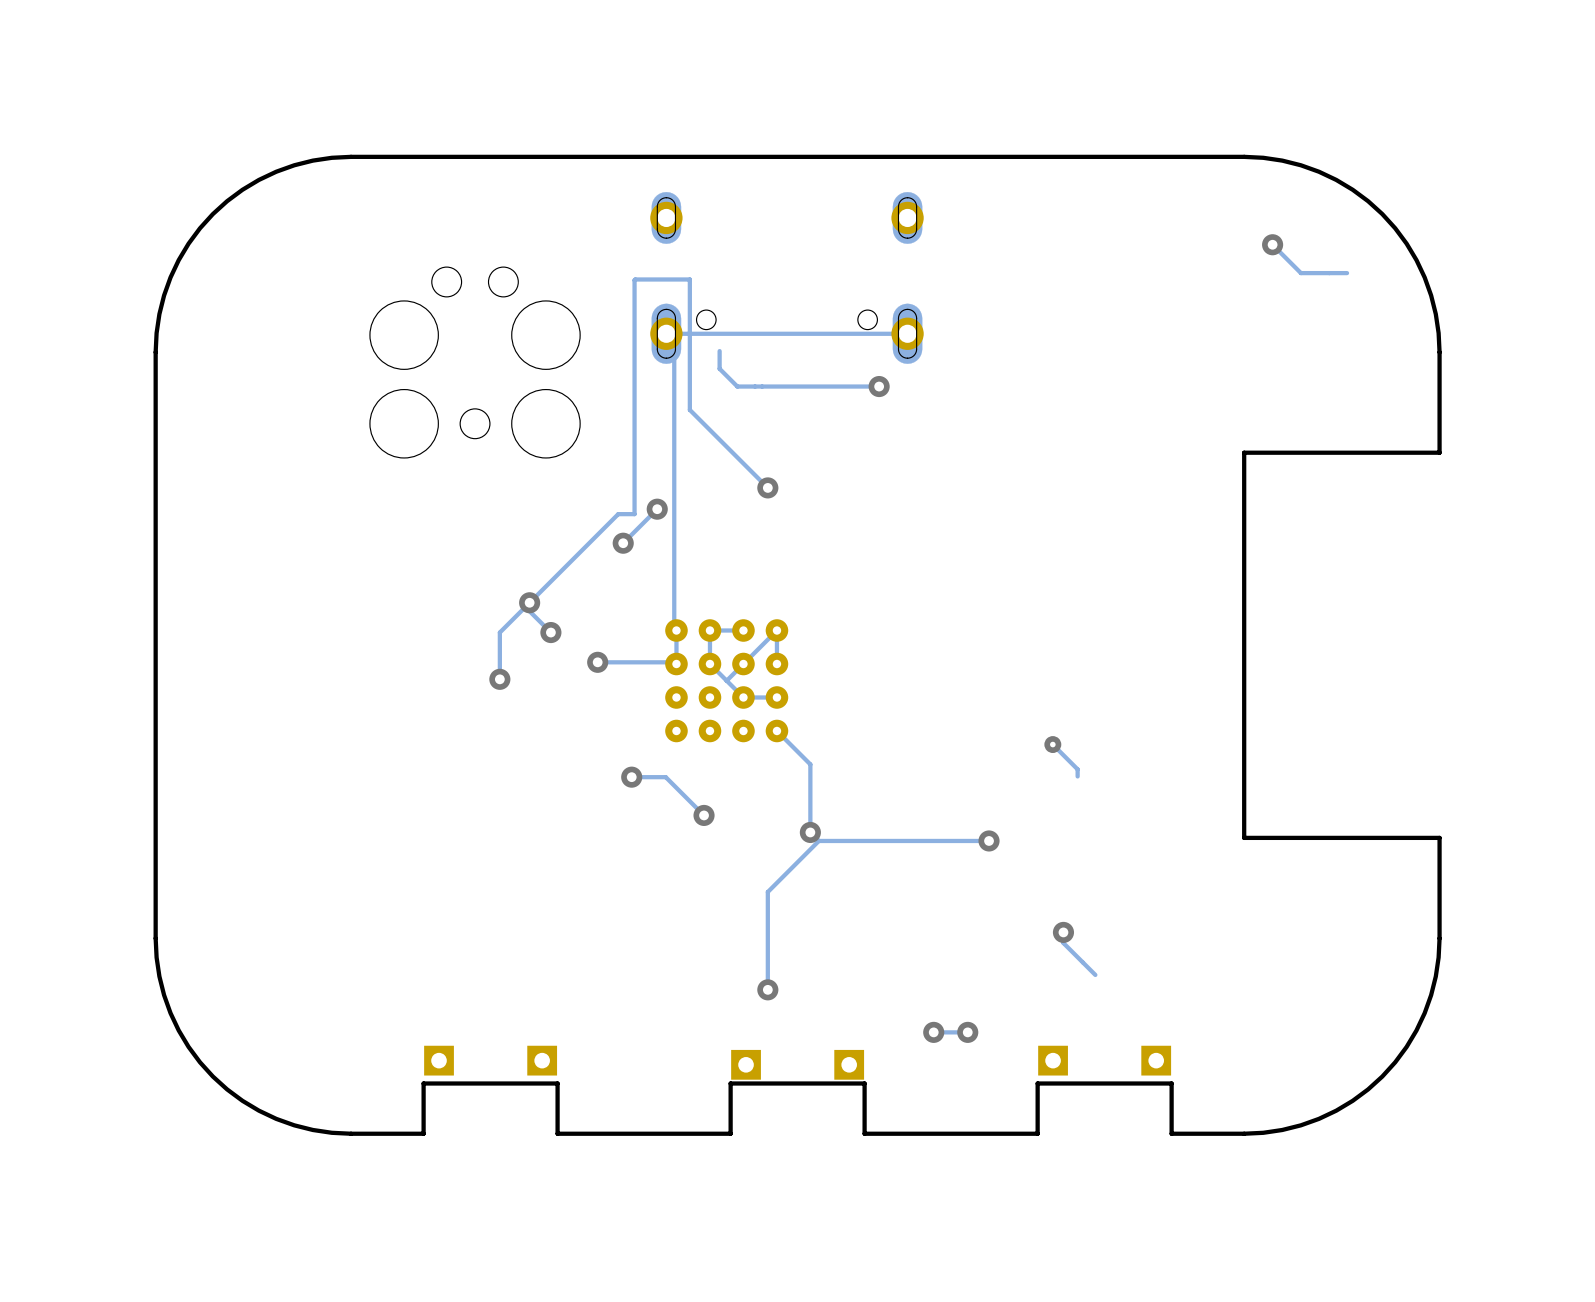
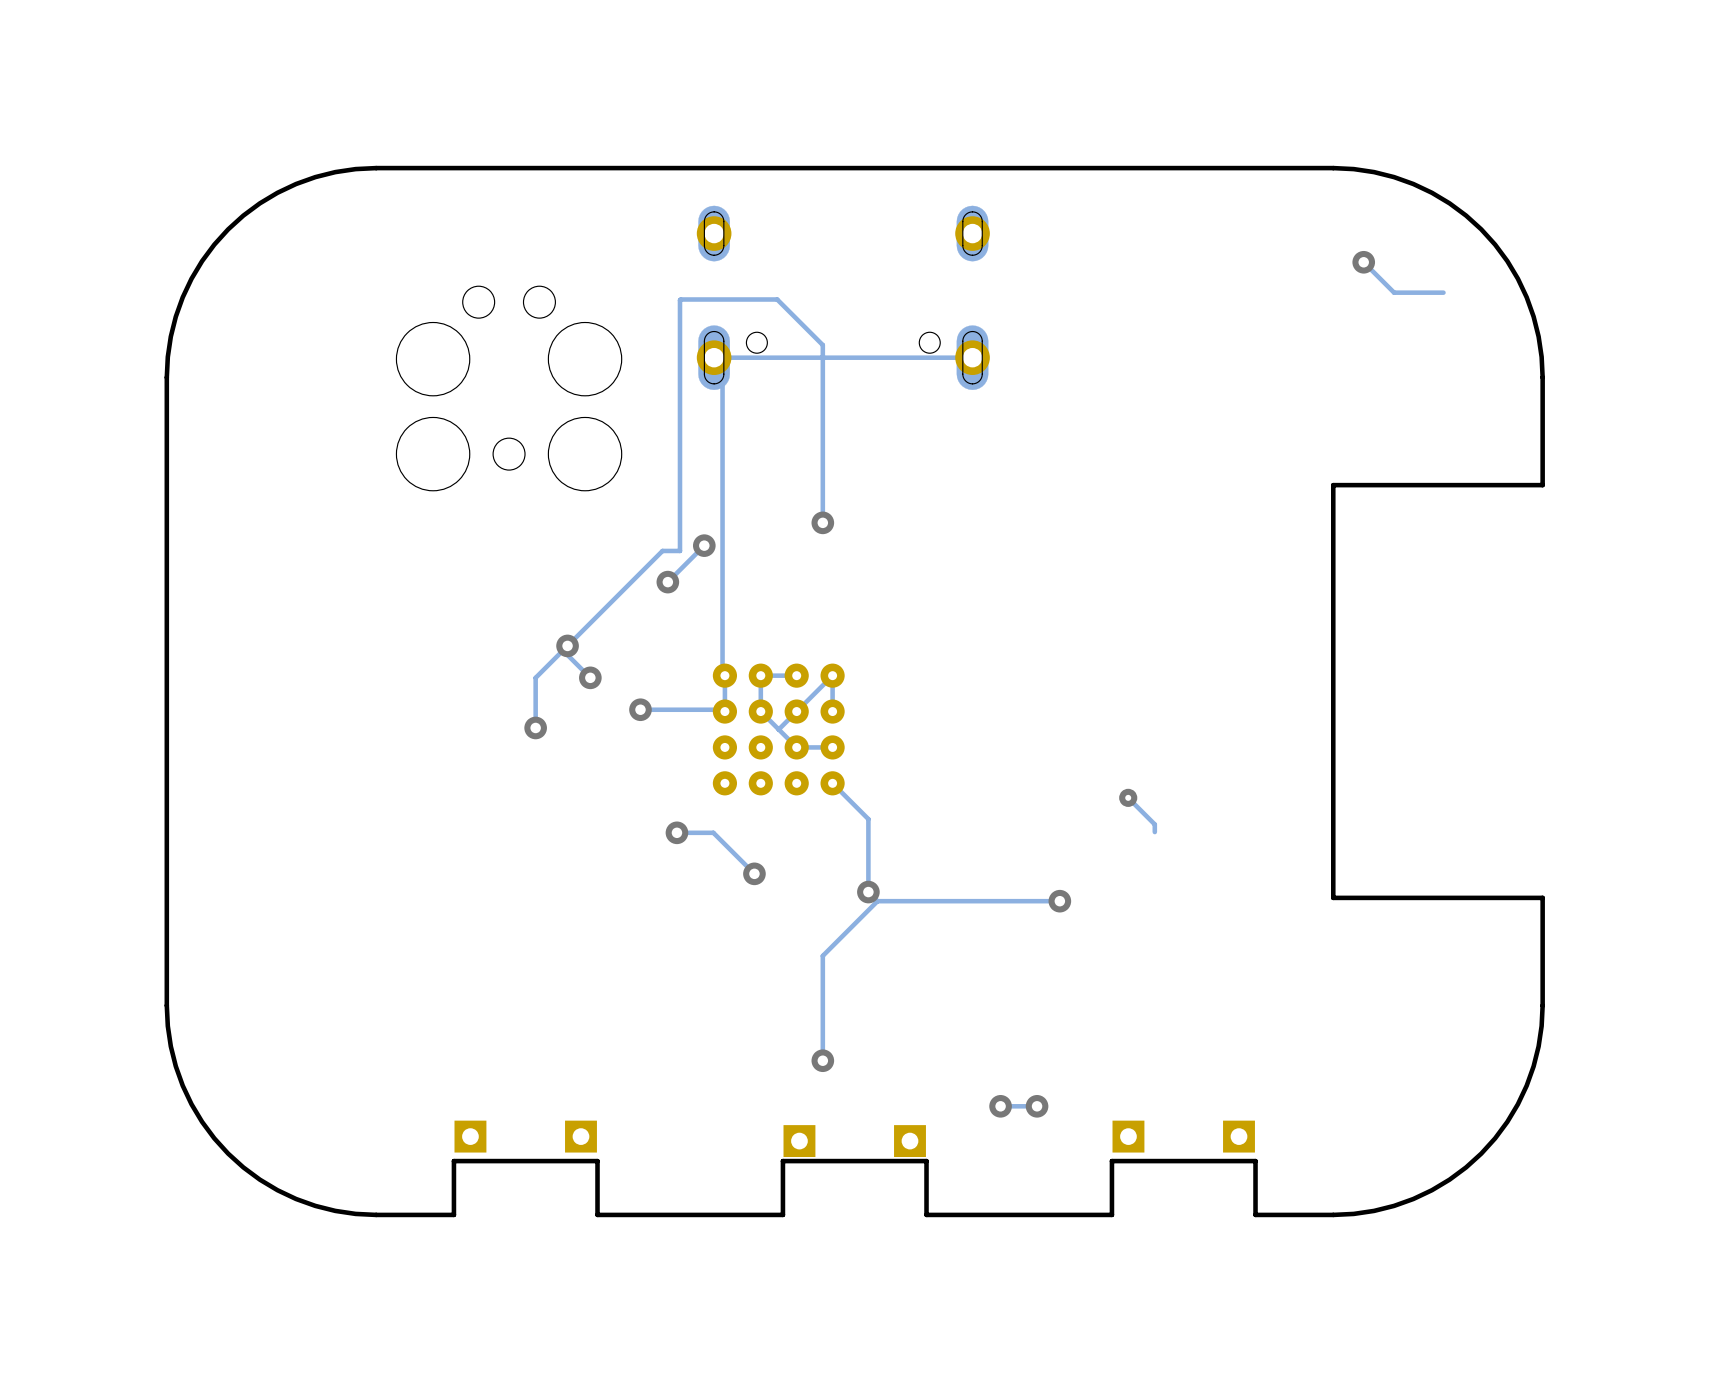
track: (689, 279) (689, 409) (767, 487) -> (739, 299) (777, 299) (822, 345) (822, 522)
track: (719, 351) (719, 368) (737, 386) (879, 386) -> none
via: (879, 386) -> none
track: (1063, 932) (1063, 943) (1095, 974) -> none
via: (1063, 932) -> none

